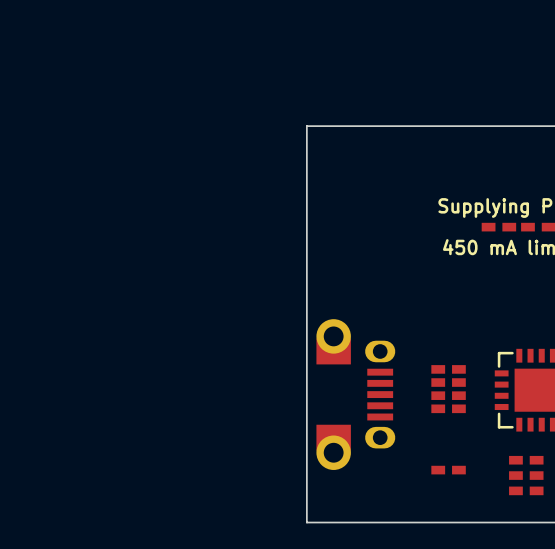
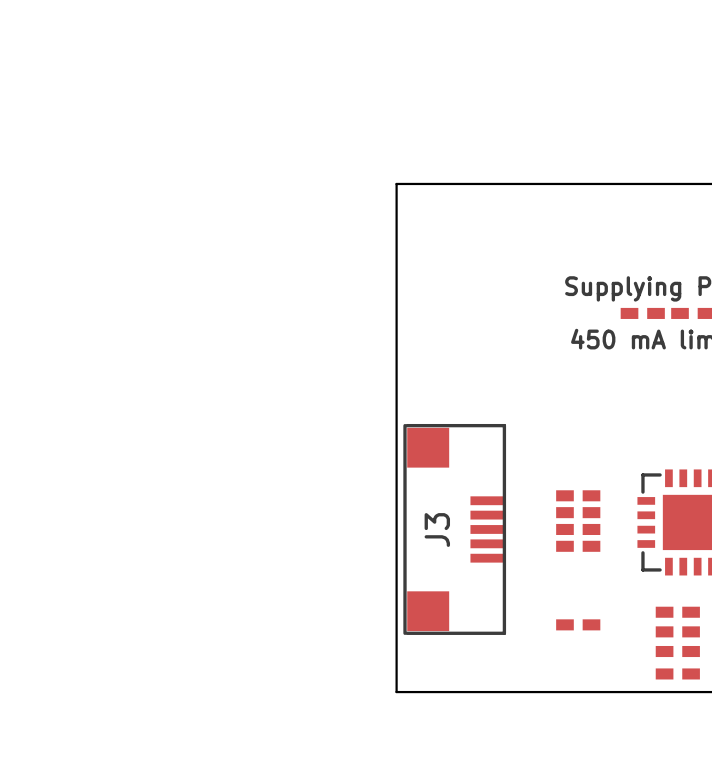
part: (355, 394) -> none
J3: none -> (454, 529)
part: none -> (677, 673)

